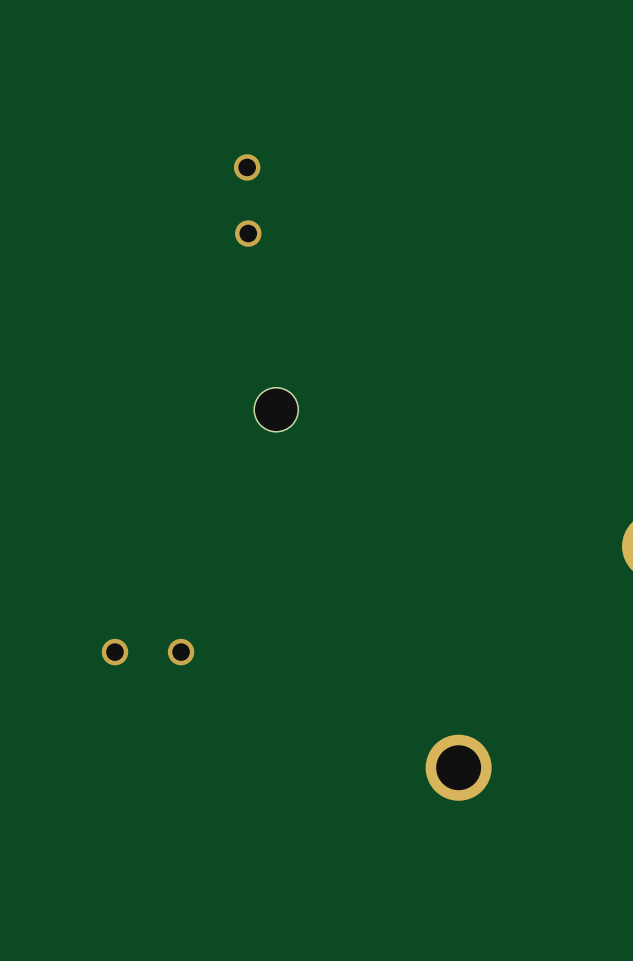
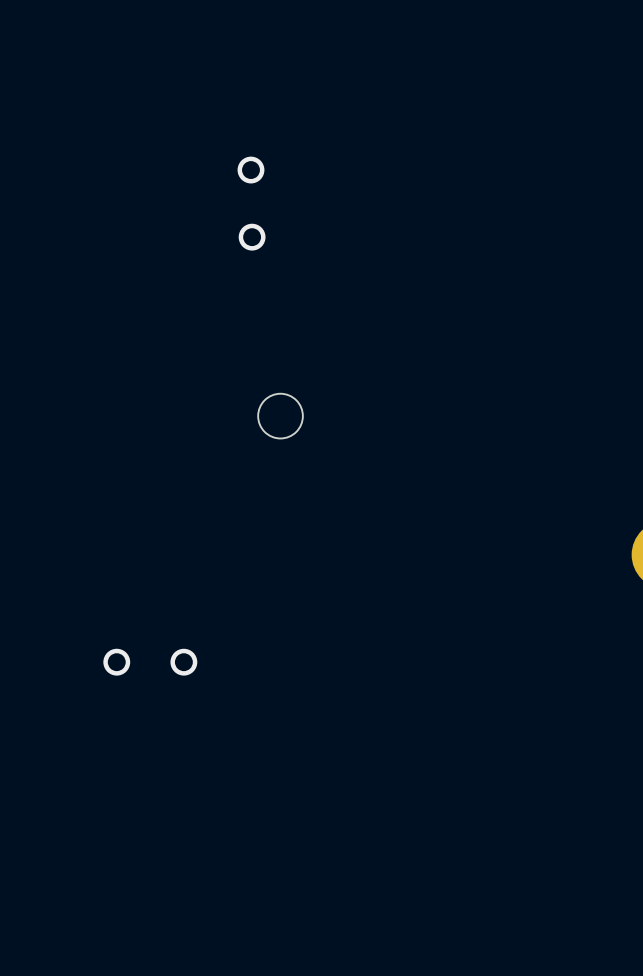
part: (458, 767) -> none

